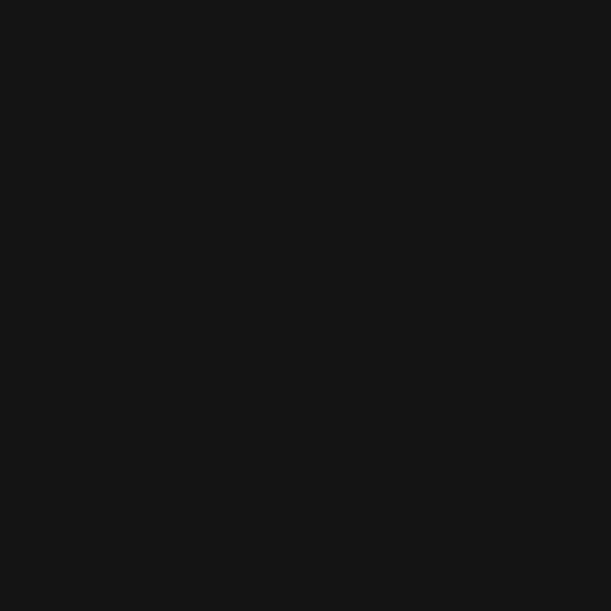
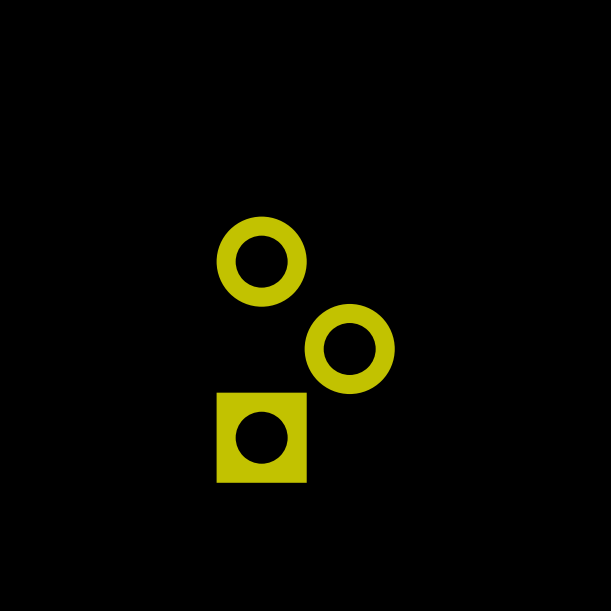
part: none -> (305, 349)

